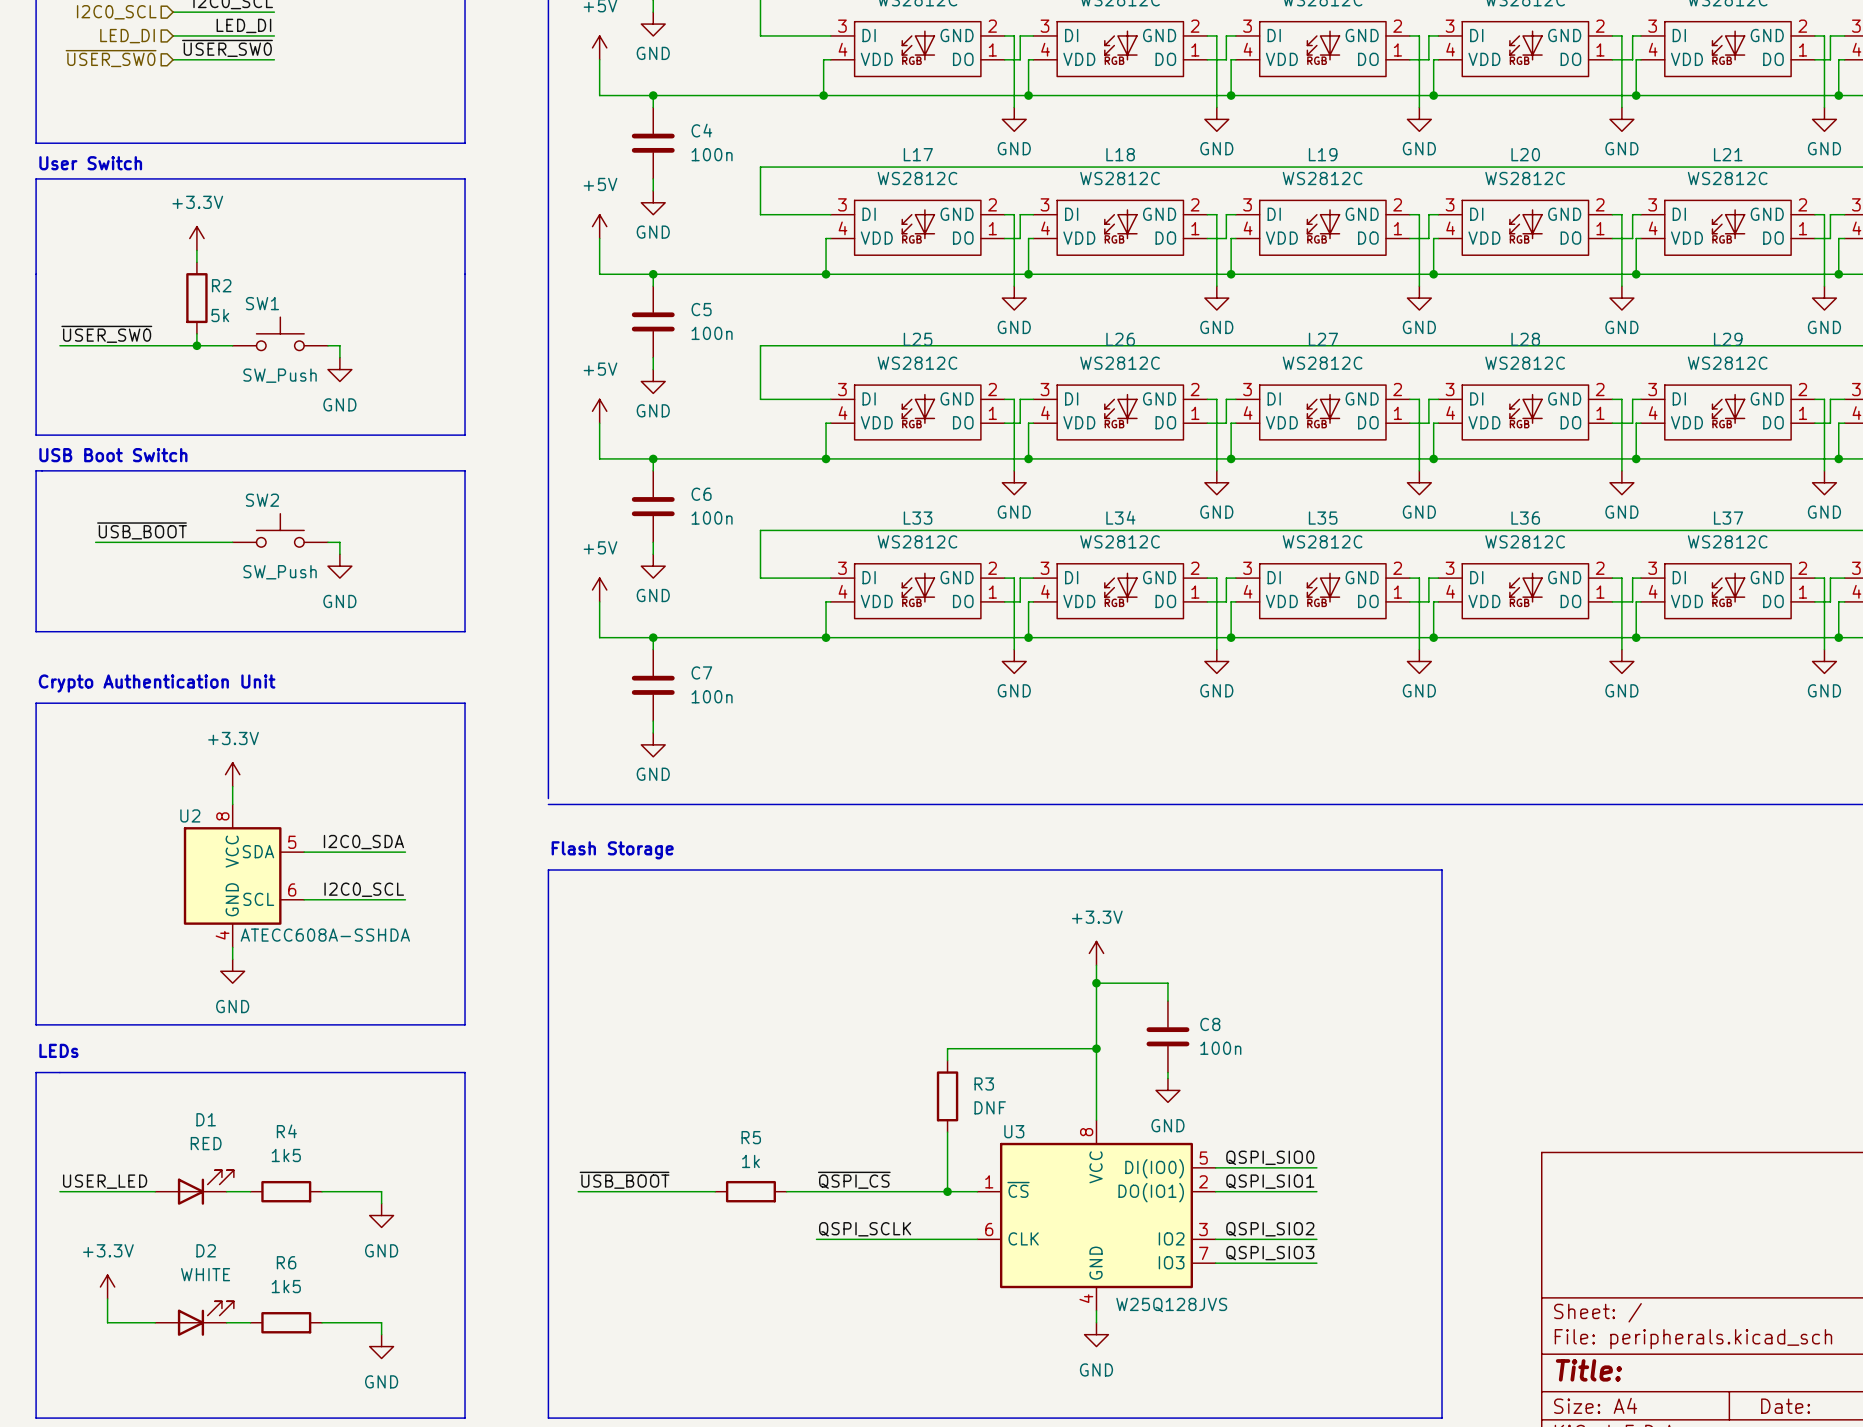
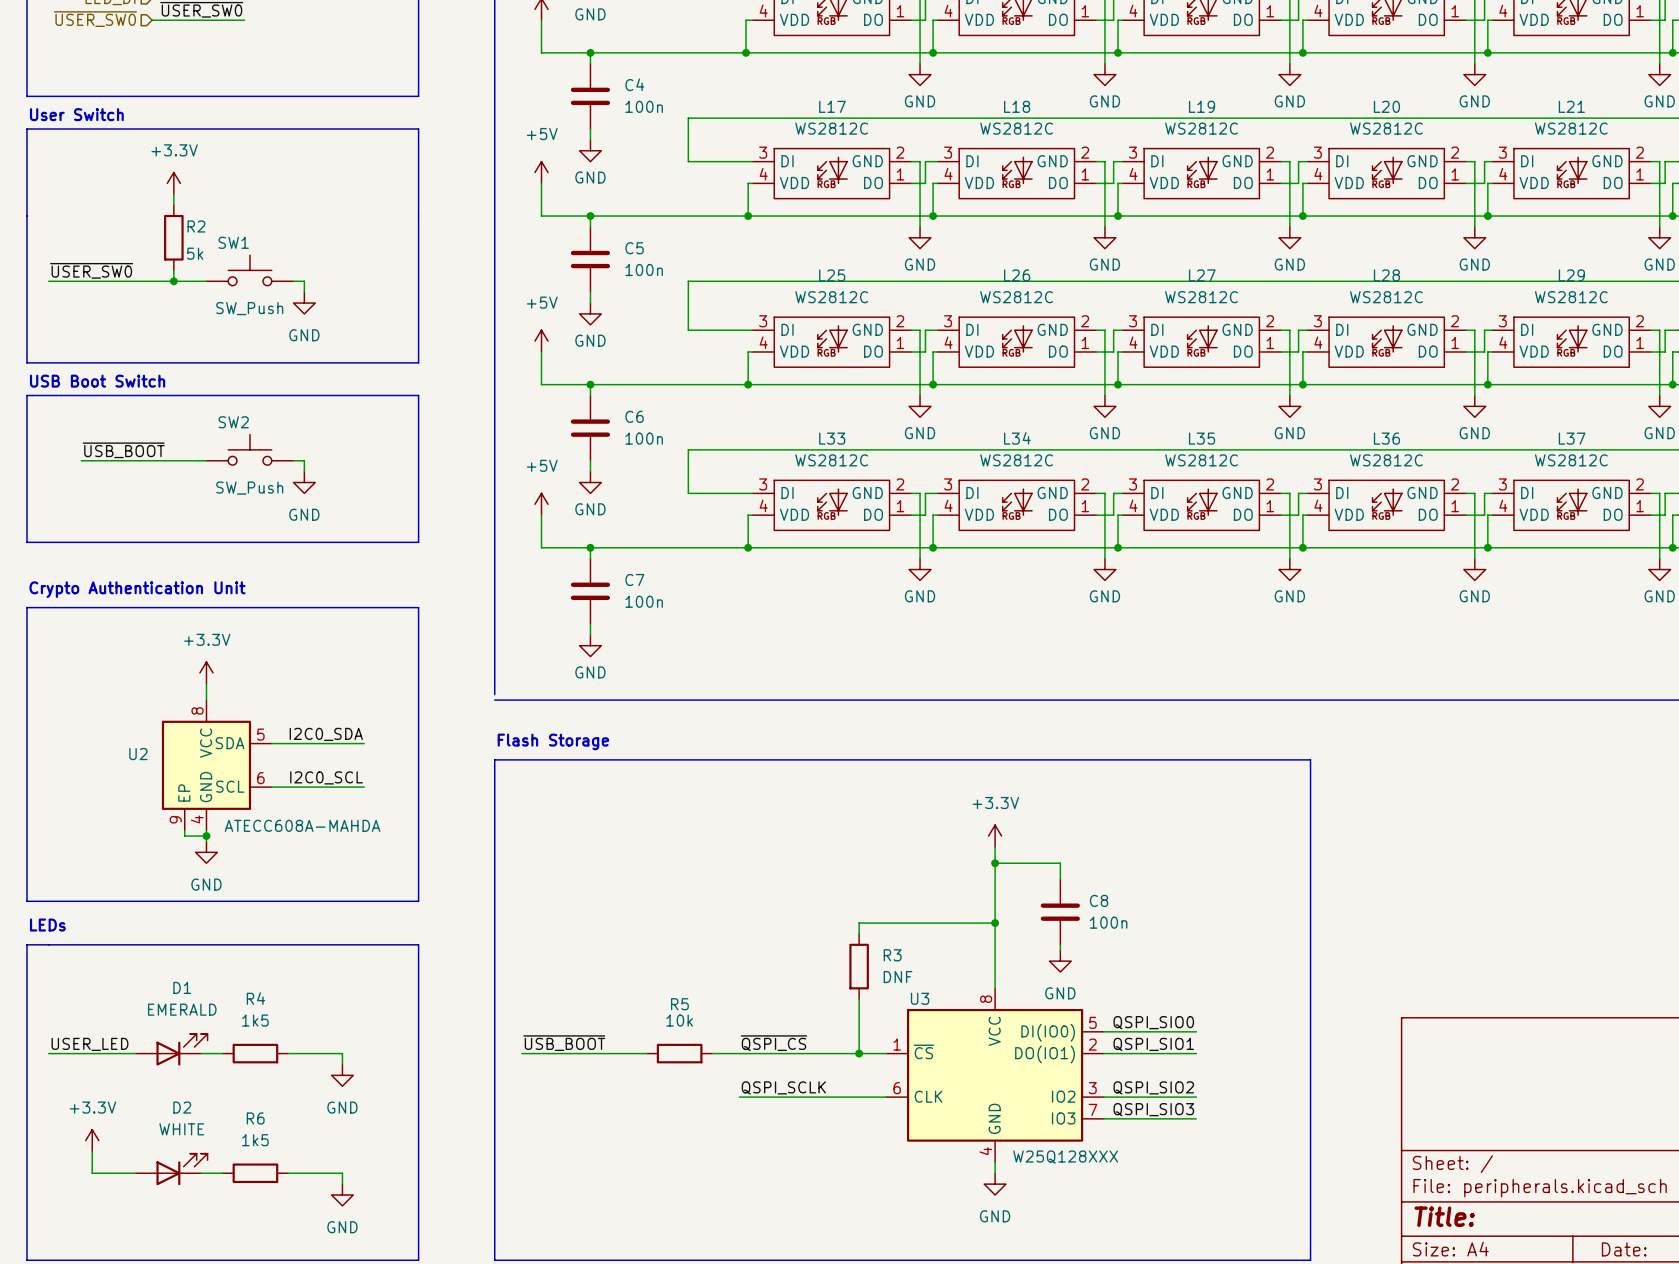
U2 symbol: [183, 804, 305, 948] -> [161, 700, 272, 831]
U2 name position: U2 (190, 815) -> U2 (138, 754)
U2 value: ATECC608A-SSHDA (325, 935) -> ATECC608A-MAHDA (302, 825)
wire: none -> (184, 830) (184, 836) (206, 836)
junction: none -> (206, 836)
D1 value: RED (206, 1143) -> EMERALD (182, 1009)
R5 value: 1k (750, 1161) -> 10k (679, 1020)
U3 value: W25Q128JVS (1171, 1305) -> W25Q128XXX (1065, 1157)

